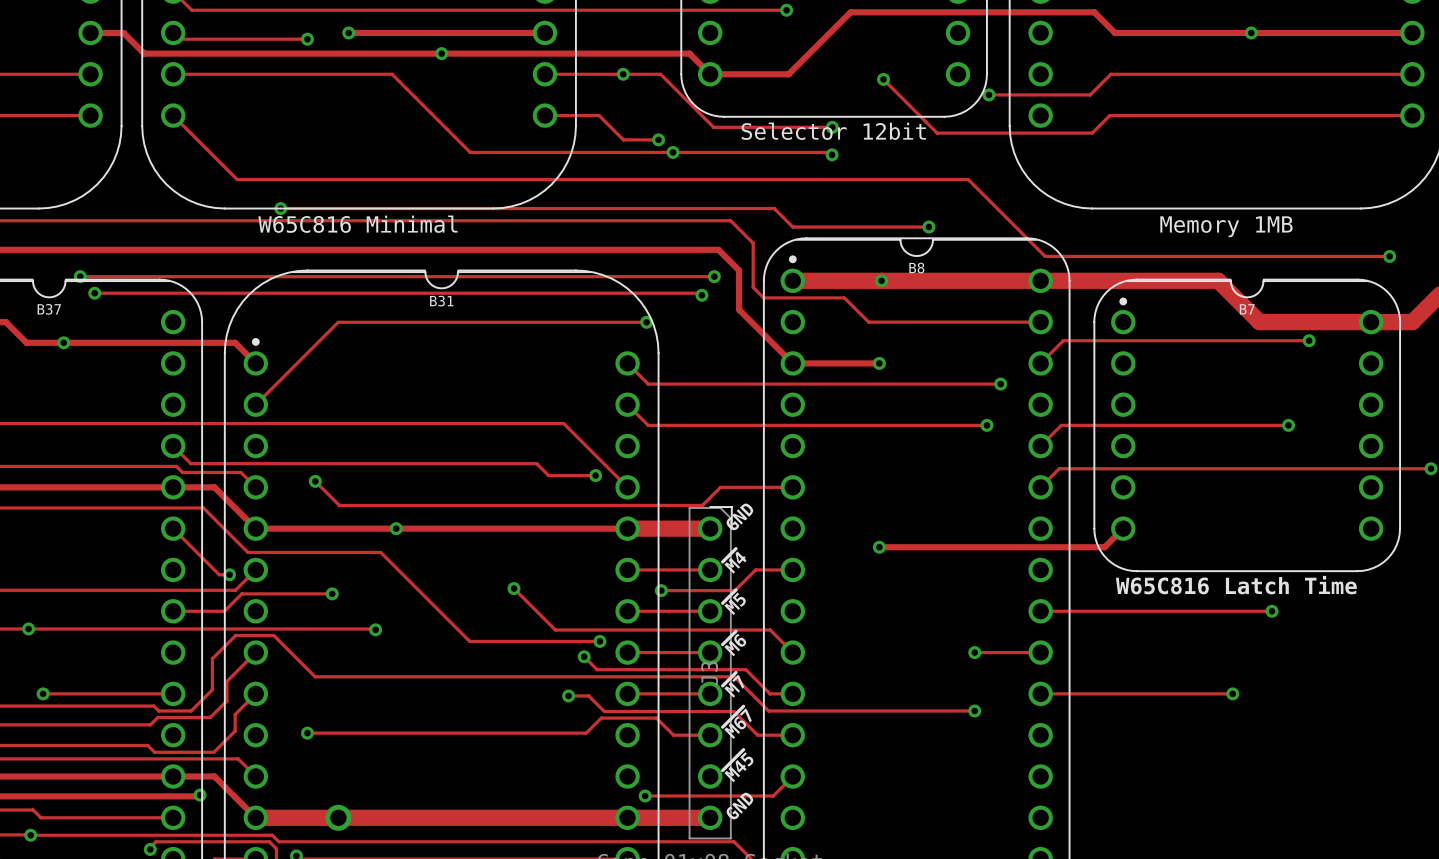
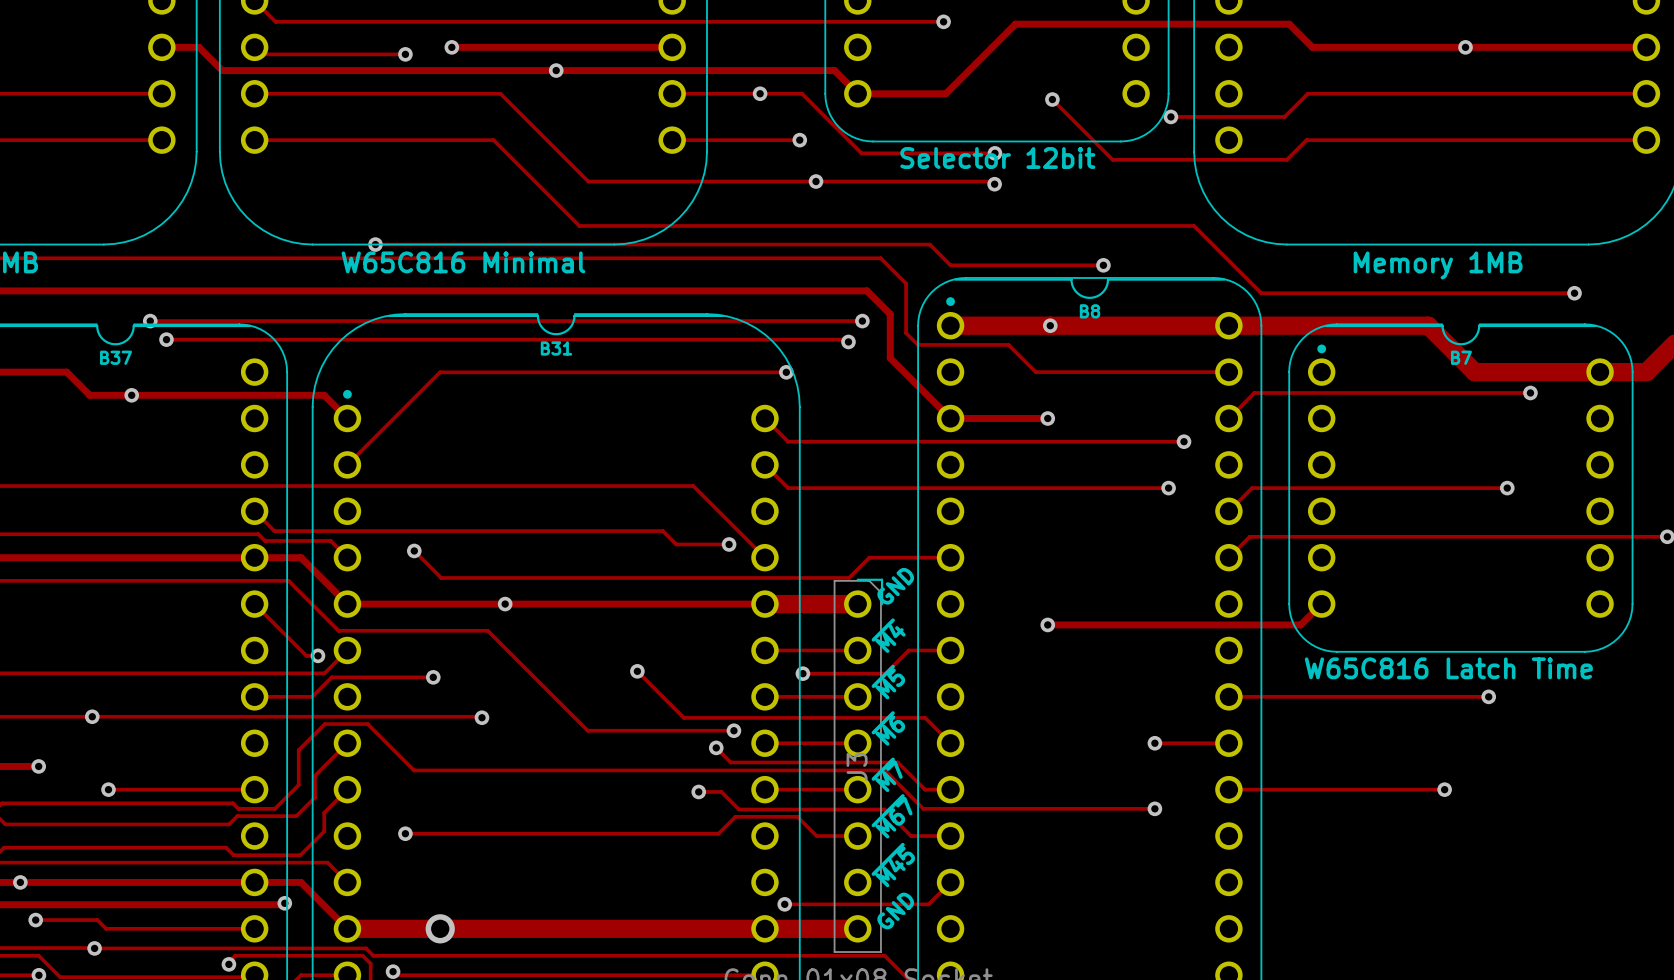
track: (173, 115) (237, 179) (968, 179) (1045, 256) (1389, 256) -> (254, 140) (493, 140) (579, 225) (1194, 225) (1261, 293) (1574, 293)
track: (599, 115) (623, 139) (658, 139) -> (733, 140) (799, 140)
via position: (658, 139) -> (799, 140)
via position: (1389, 256) -> (1574, 293)

